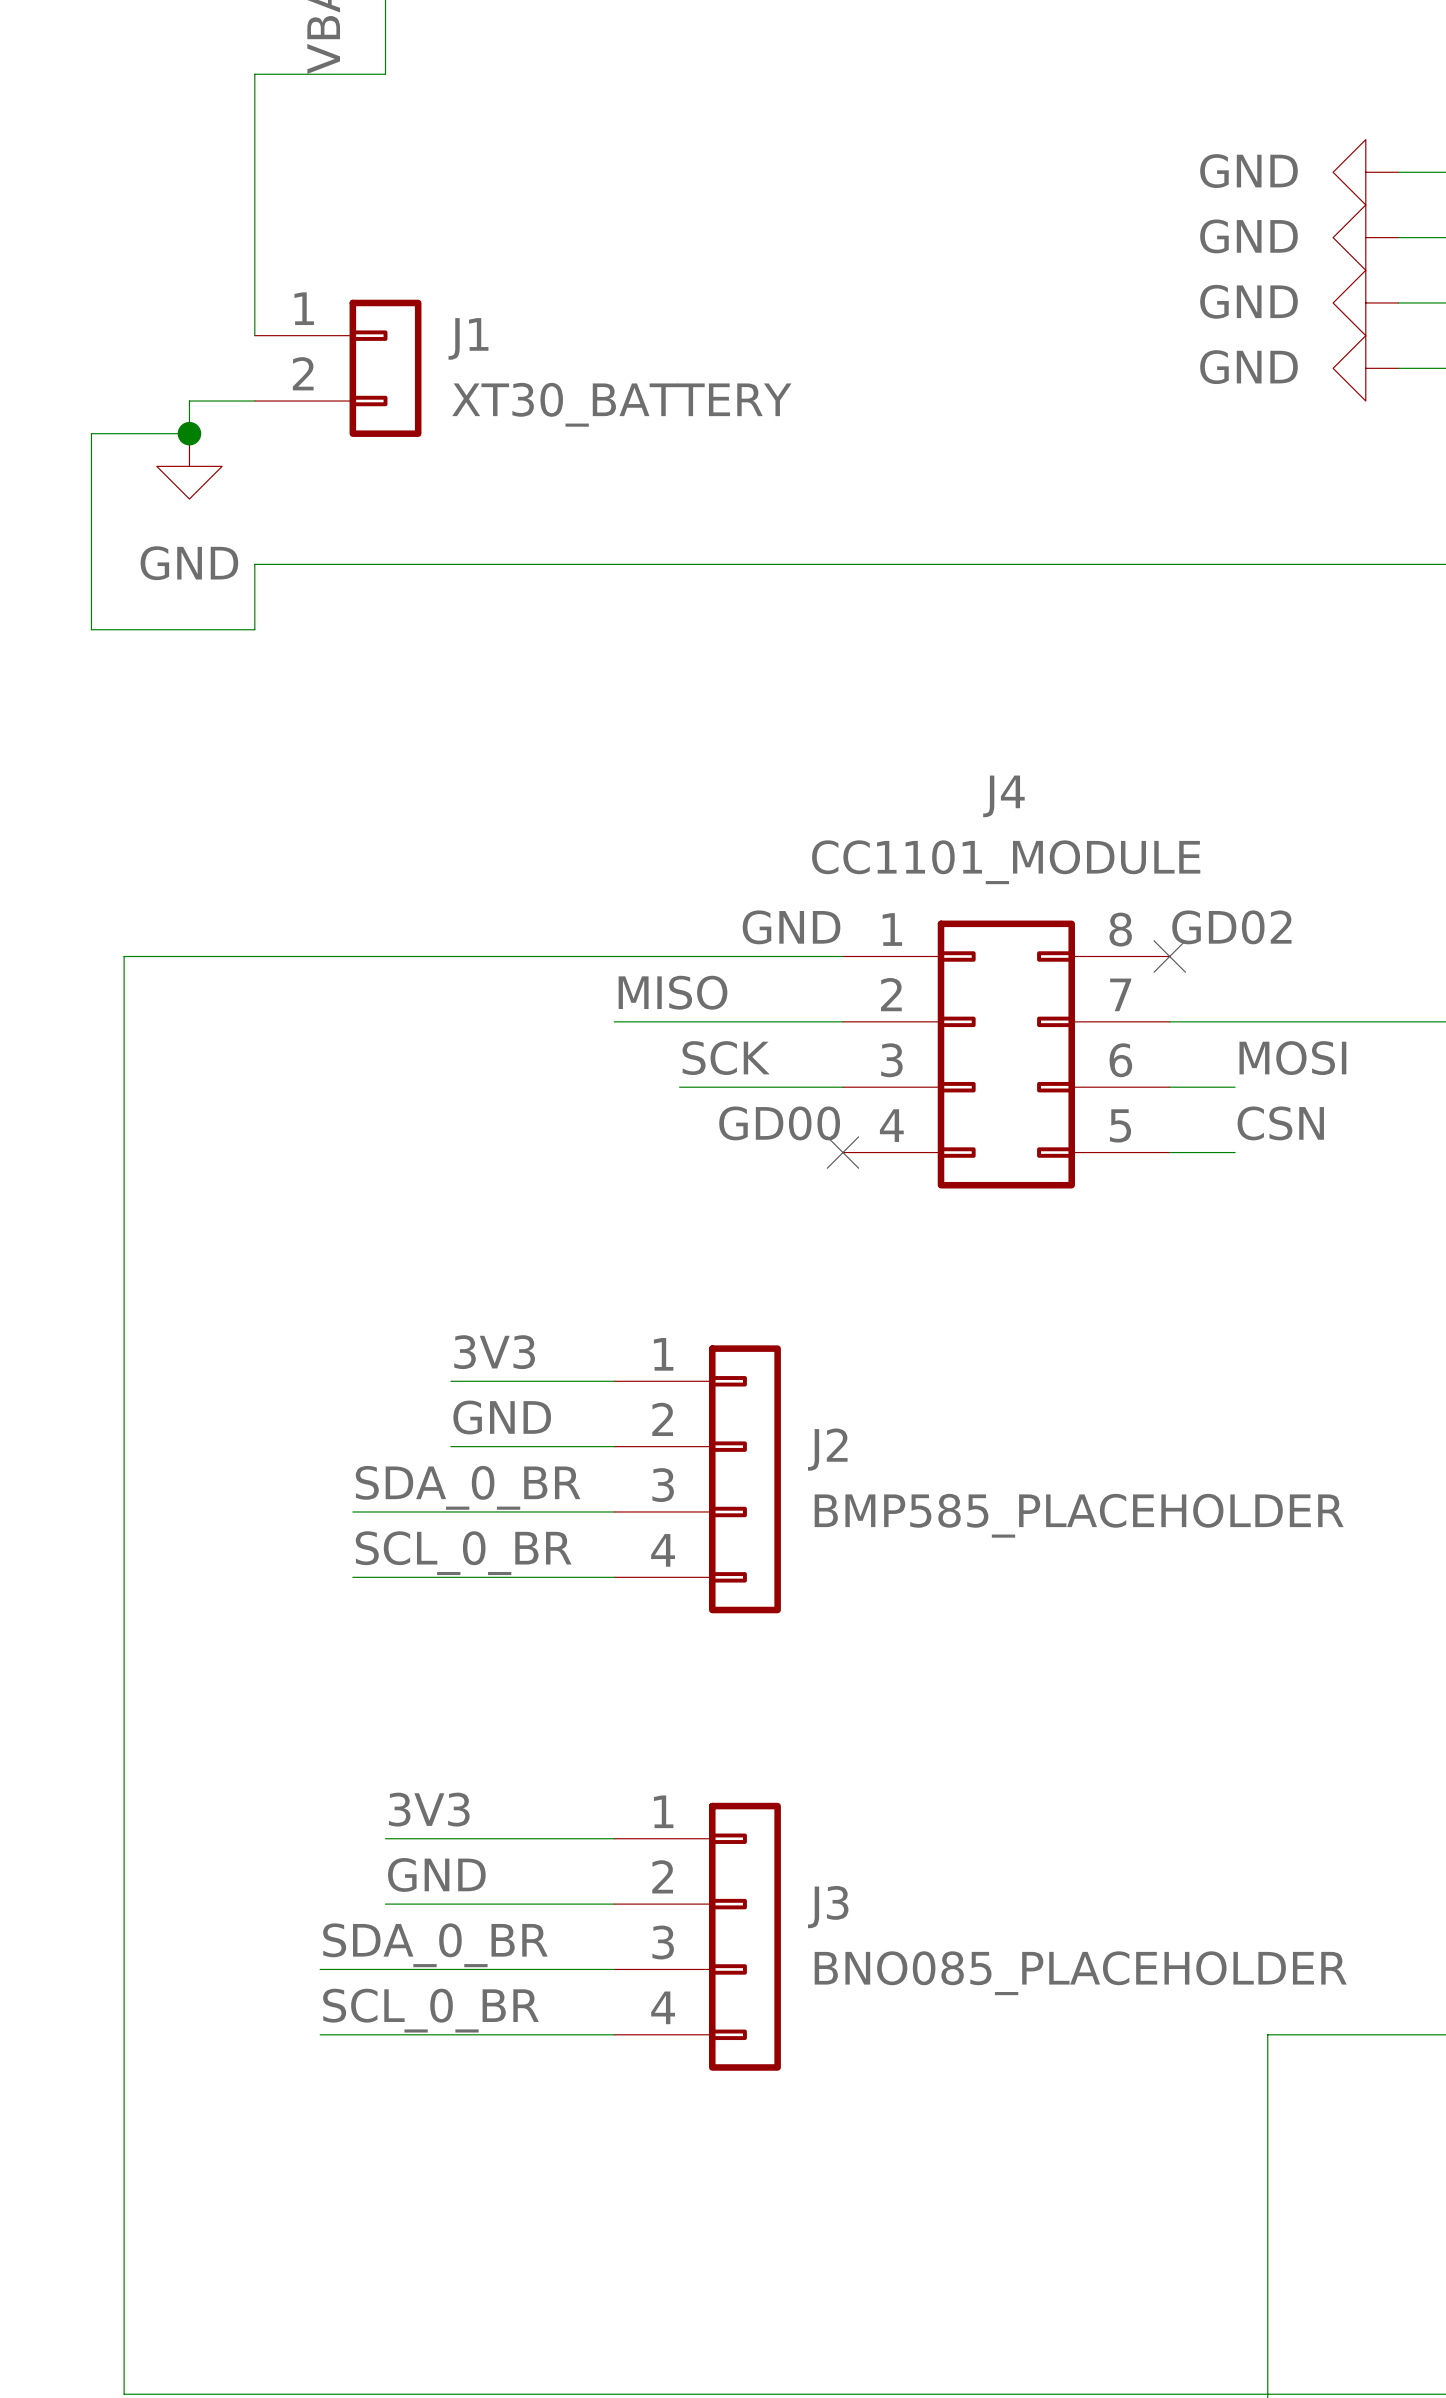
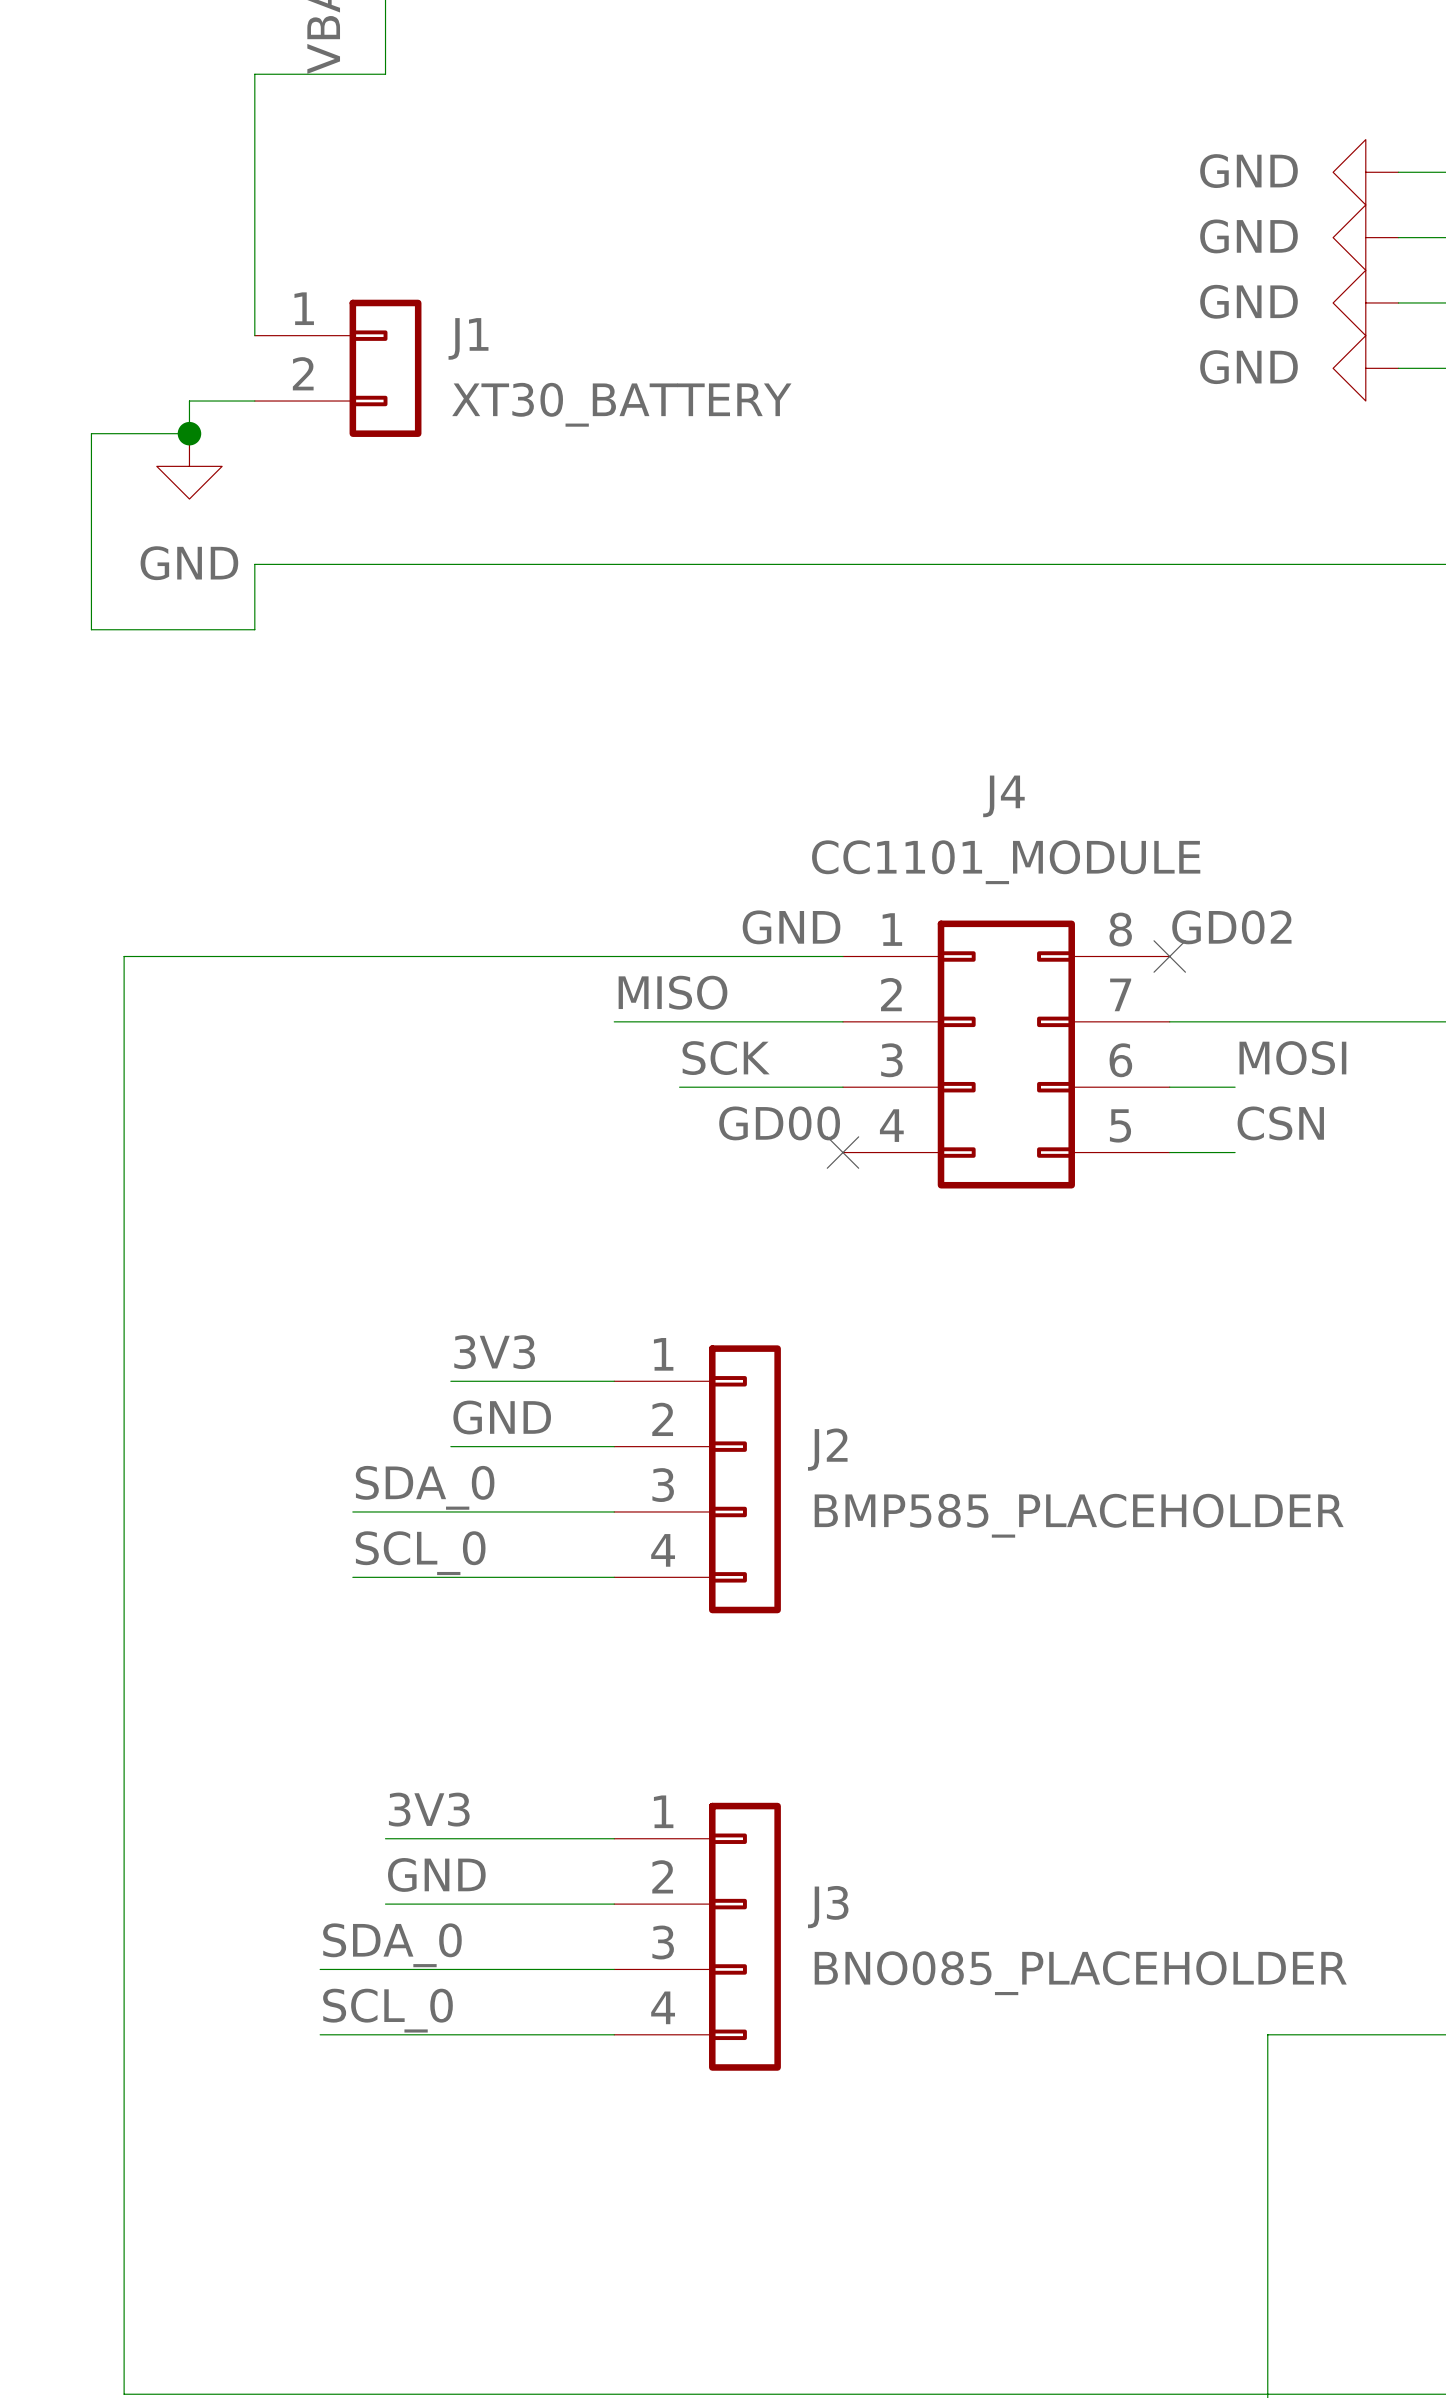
label: SDA_0_BR (468, 1487) -> SDA_0 (425, 1487)
label: SCL_0_BR (463, 1553) -> SCL_0 (420, 1553)
label: SDA_0_BR (435, 1945) -> SDA_0 (392, 1945)
label: SCL_0_BR (430, 2010) -> SCL_0 (387, 2010)

